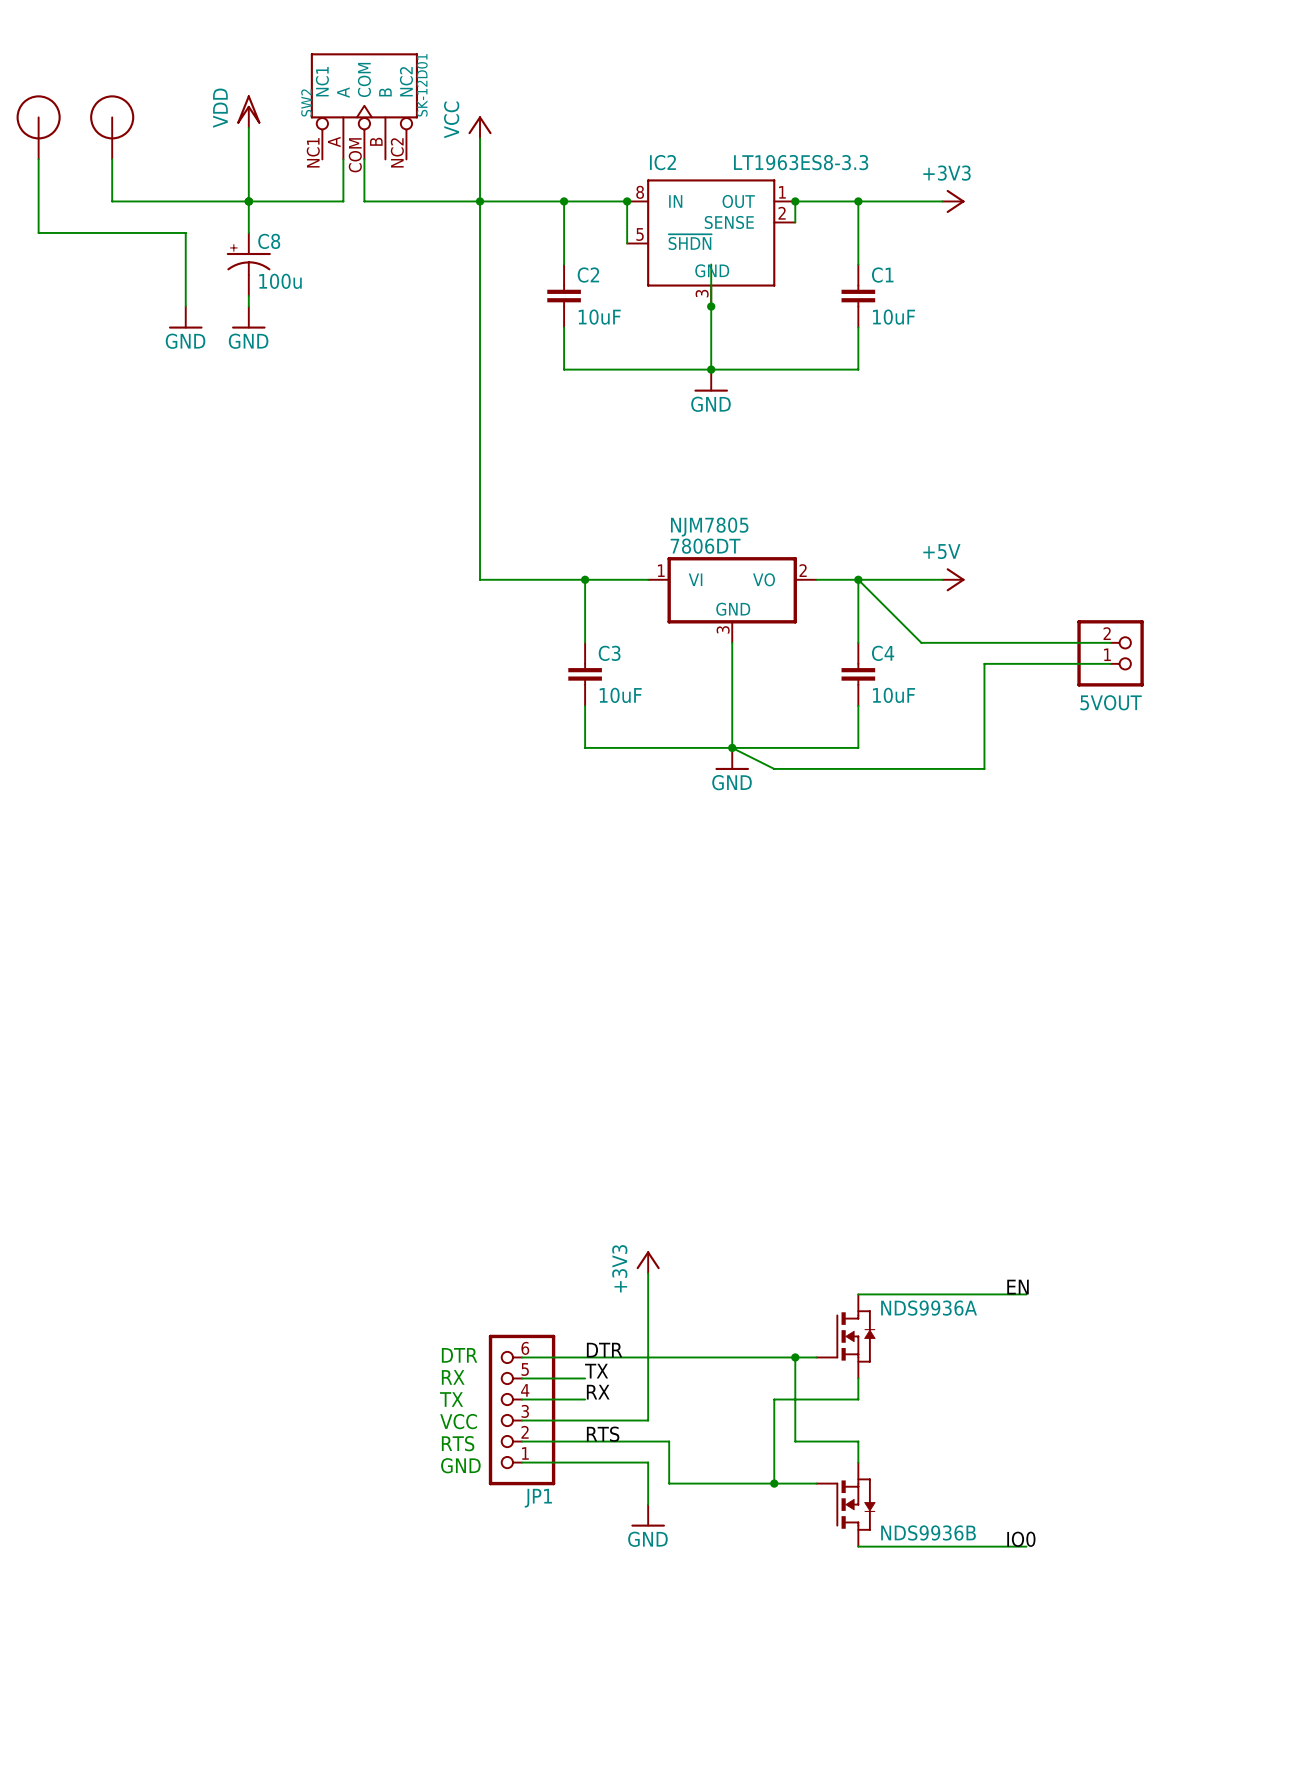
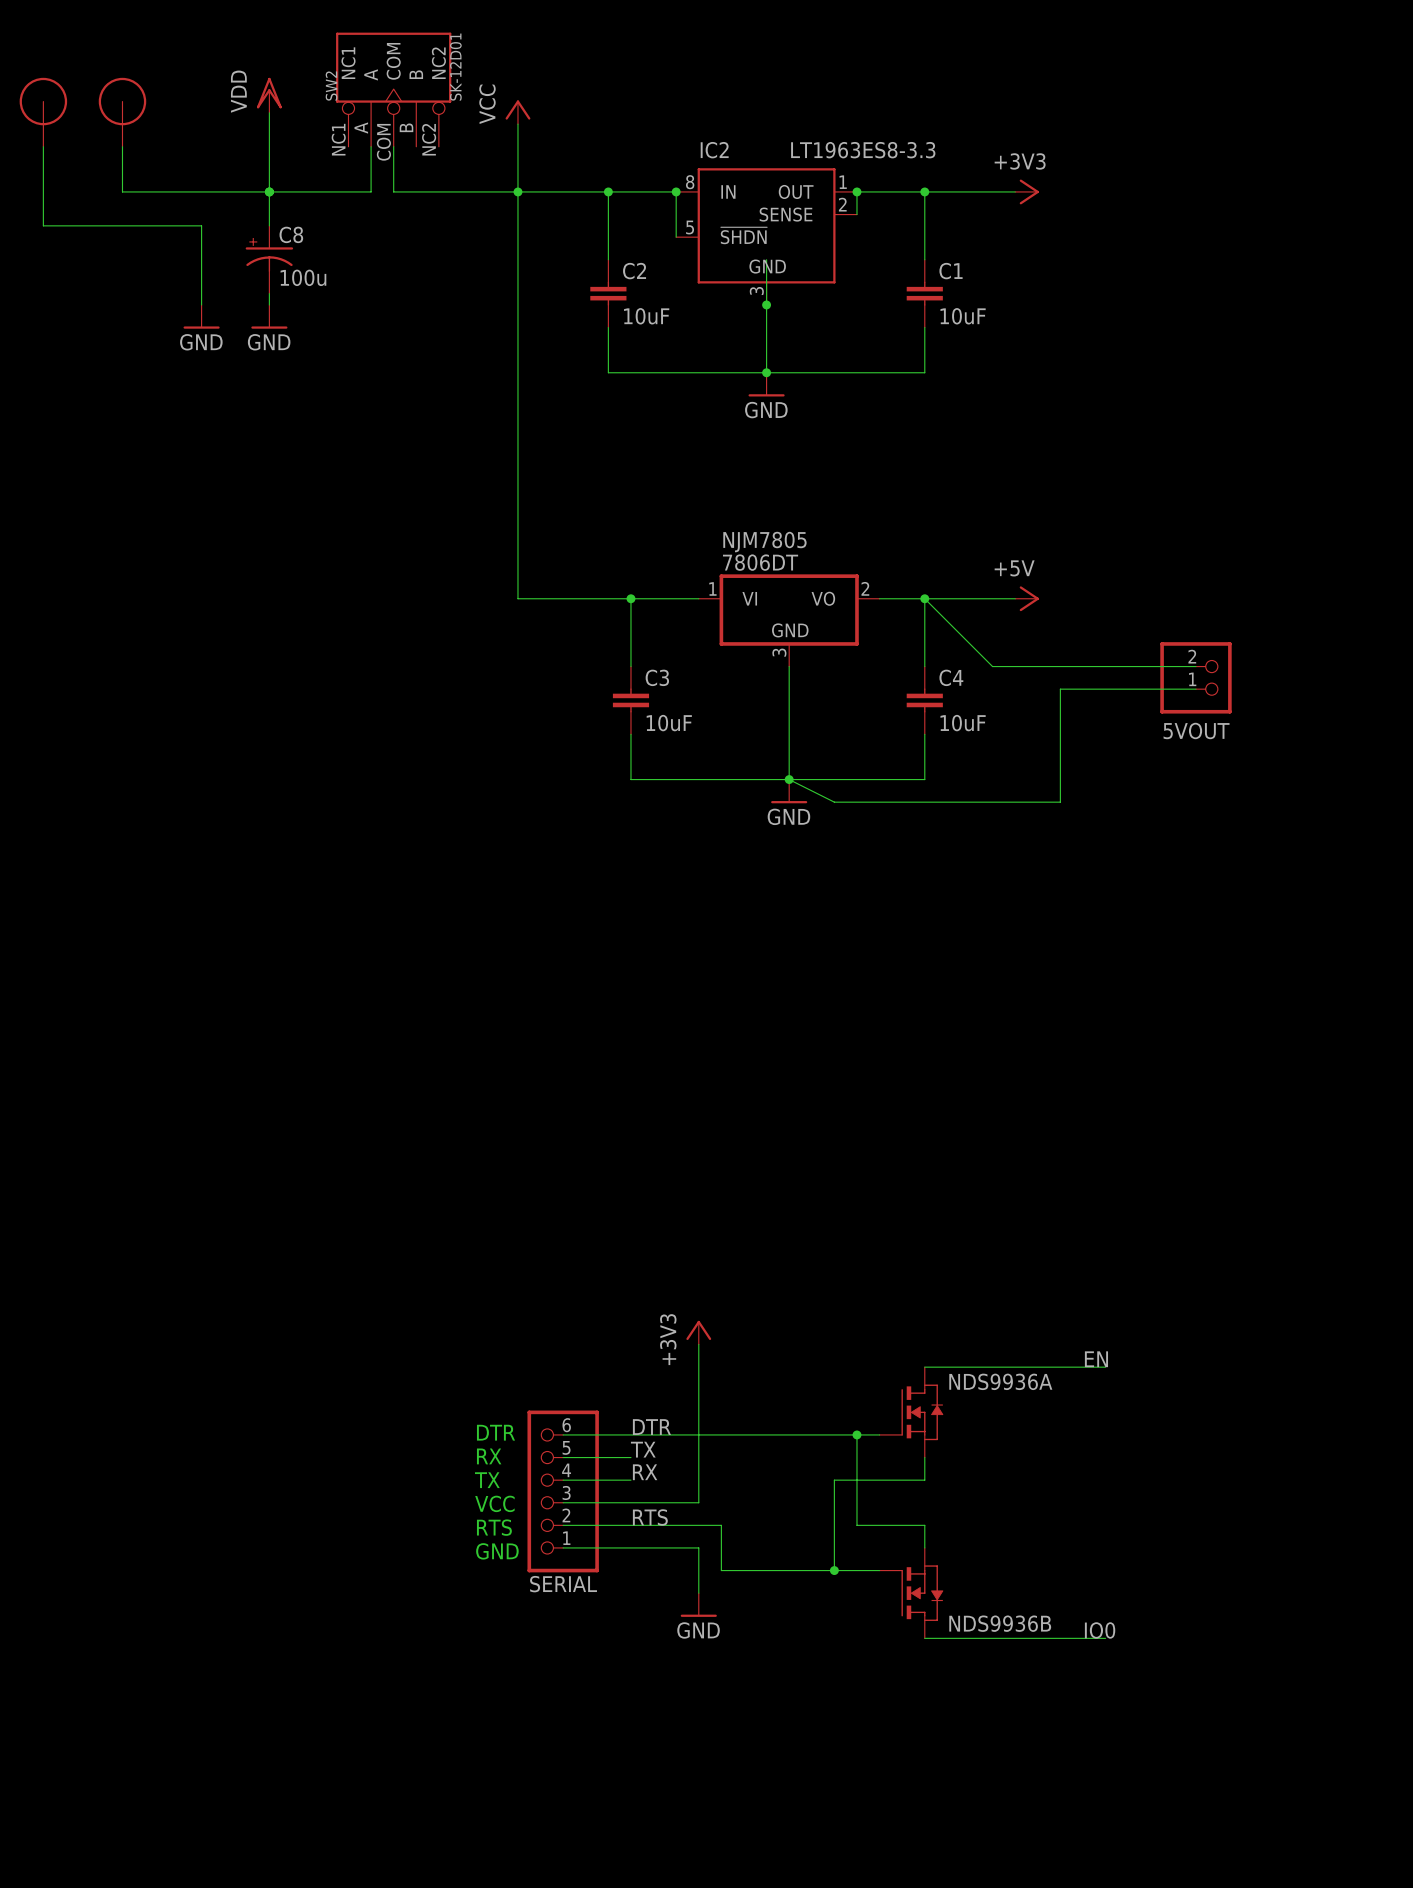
JP1 name: JP1 (538, 1498) -> SERIAL (563, 1584)

